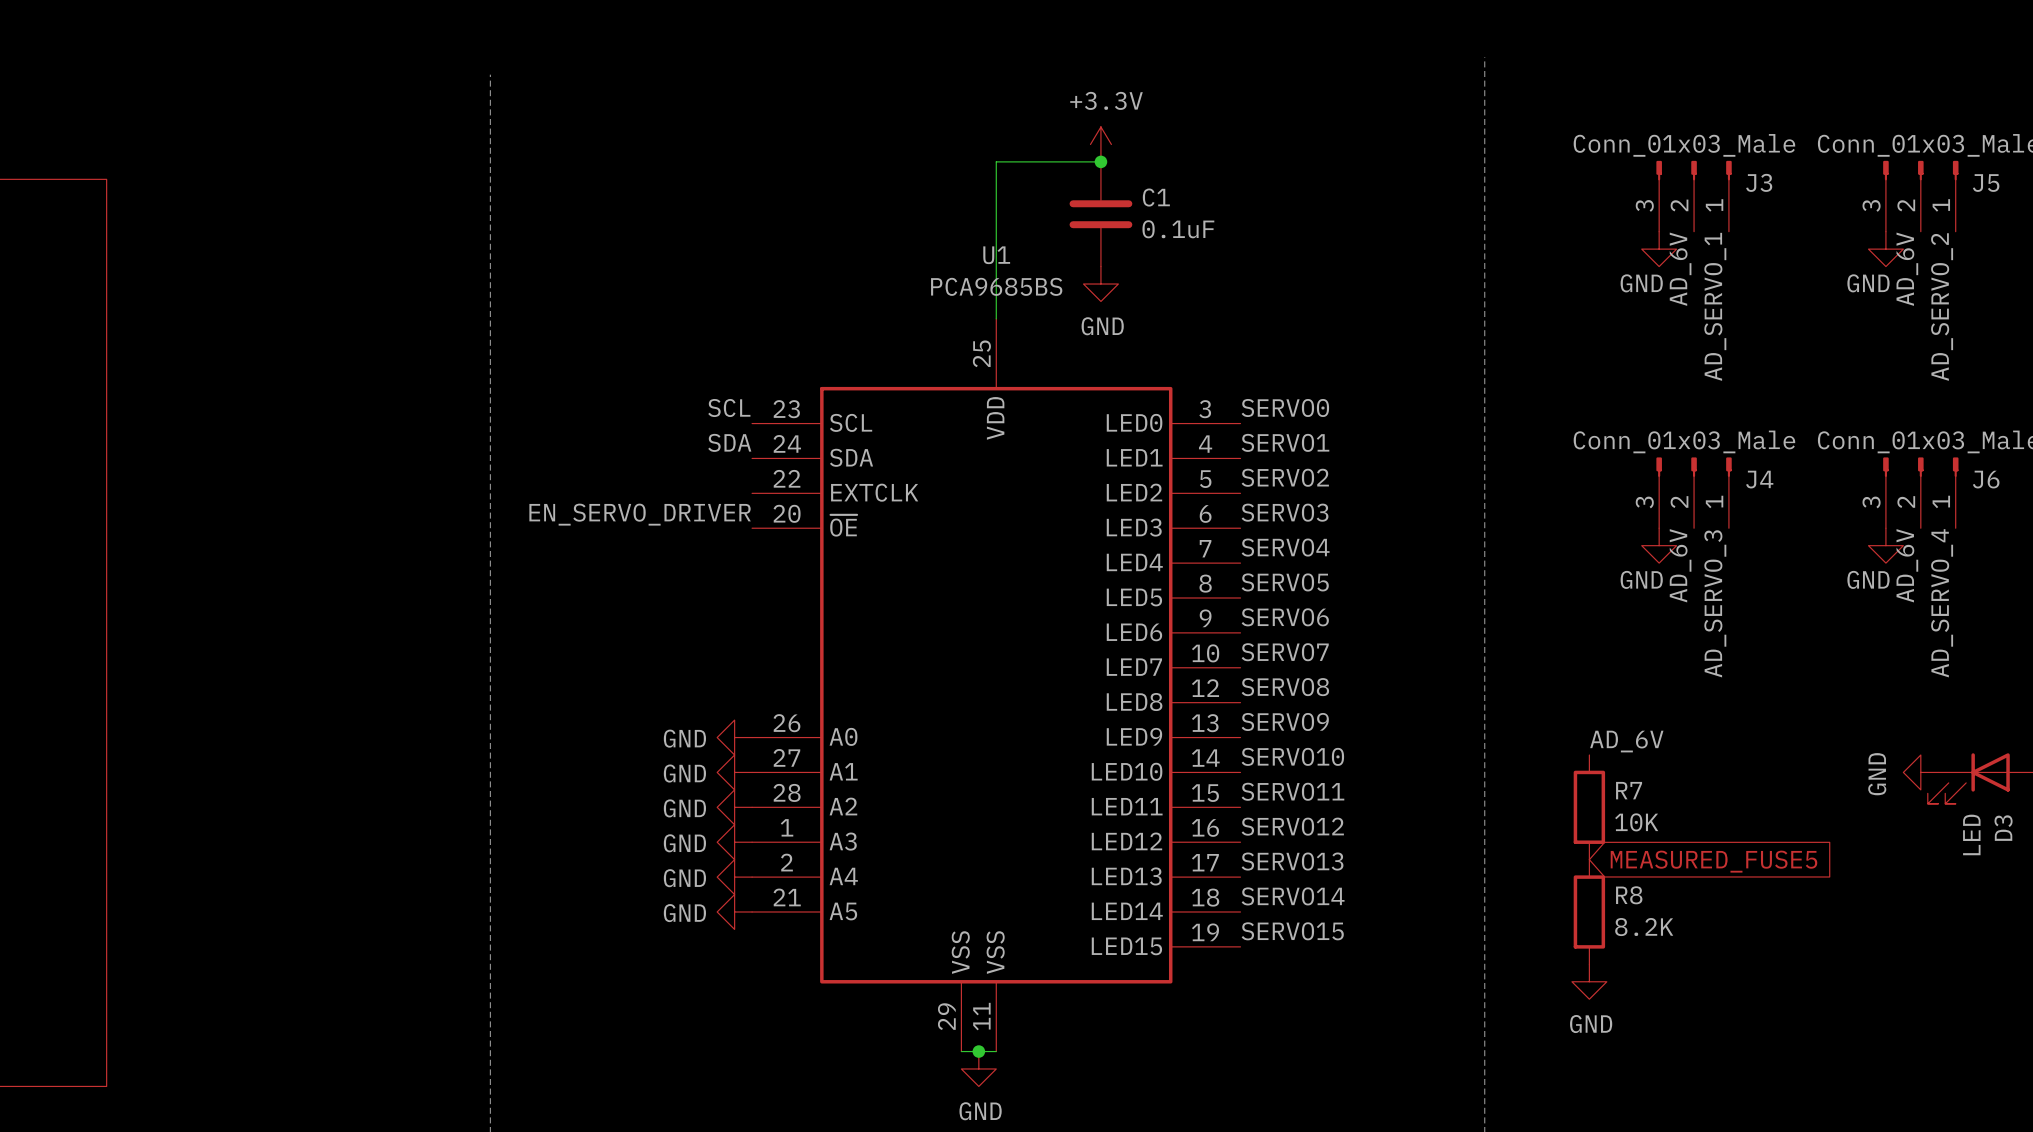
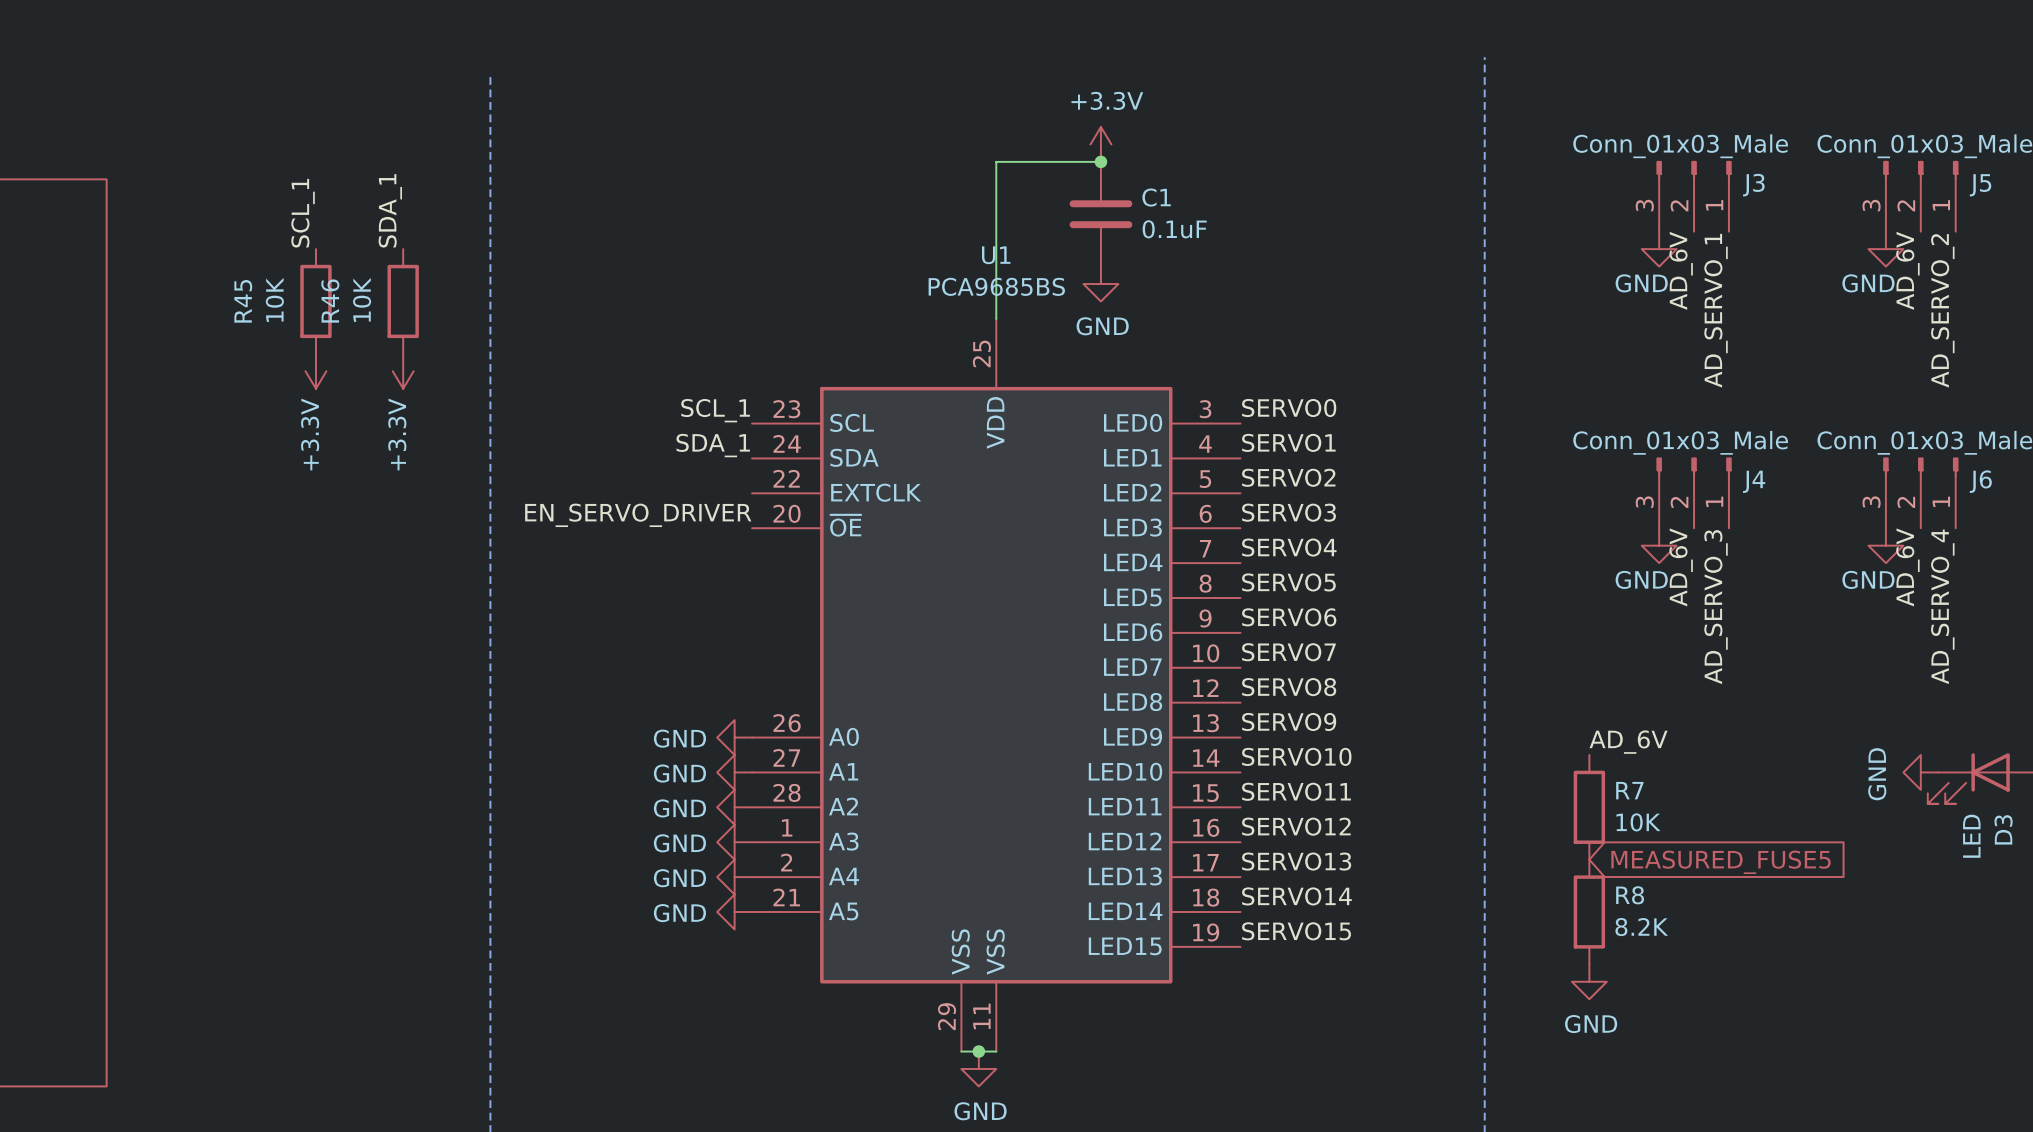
label: none -> SCL_1 (303, 213)
label: none -> SDA_1 (390, 210)
R45: none -> 10K (315, 301)
R46: none -> 10K (403, 301)
power symbol: none -> +3.3V (315, 371)
power symbol: none -> +3.3V (403, 371)
label: SCL (729, 407) -> SCL_1 (715, 410)
label: SDA (729, 442) -> SDA_1 (713, 445)

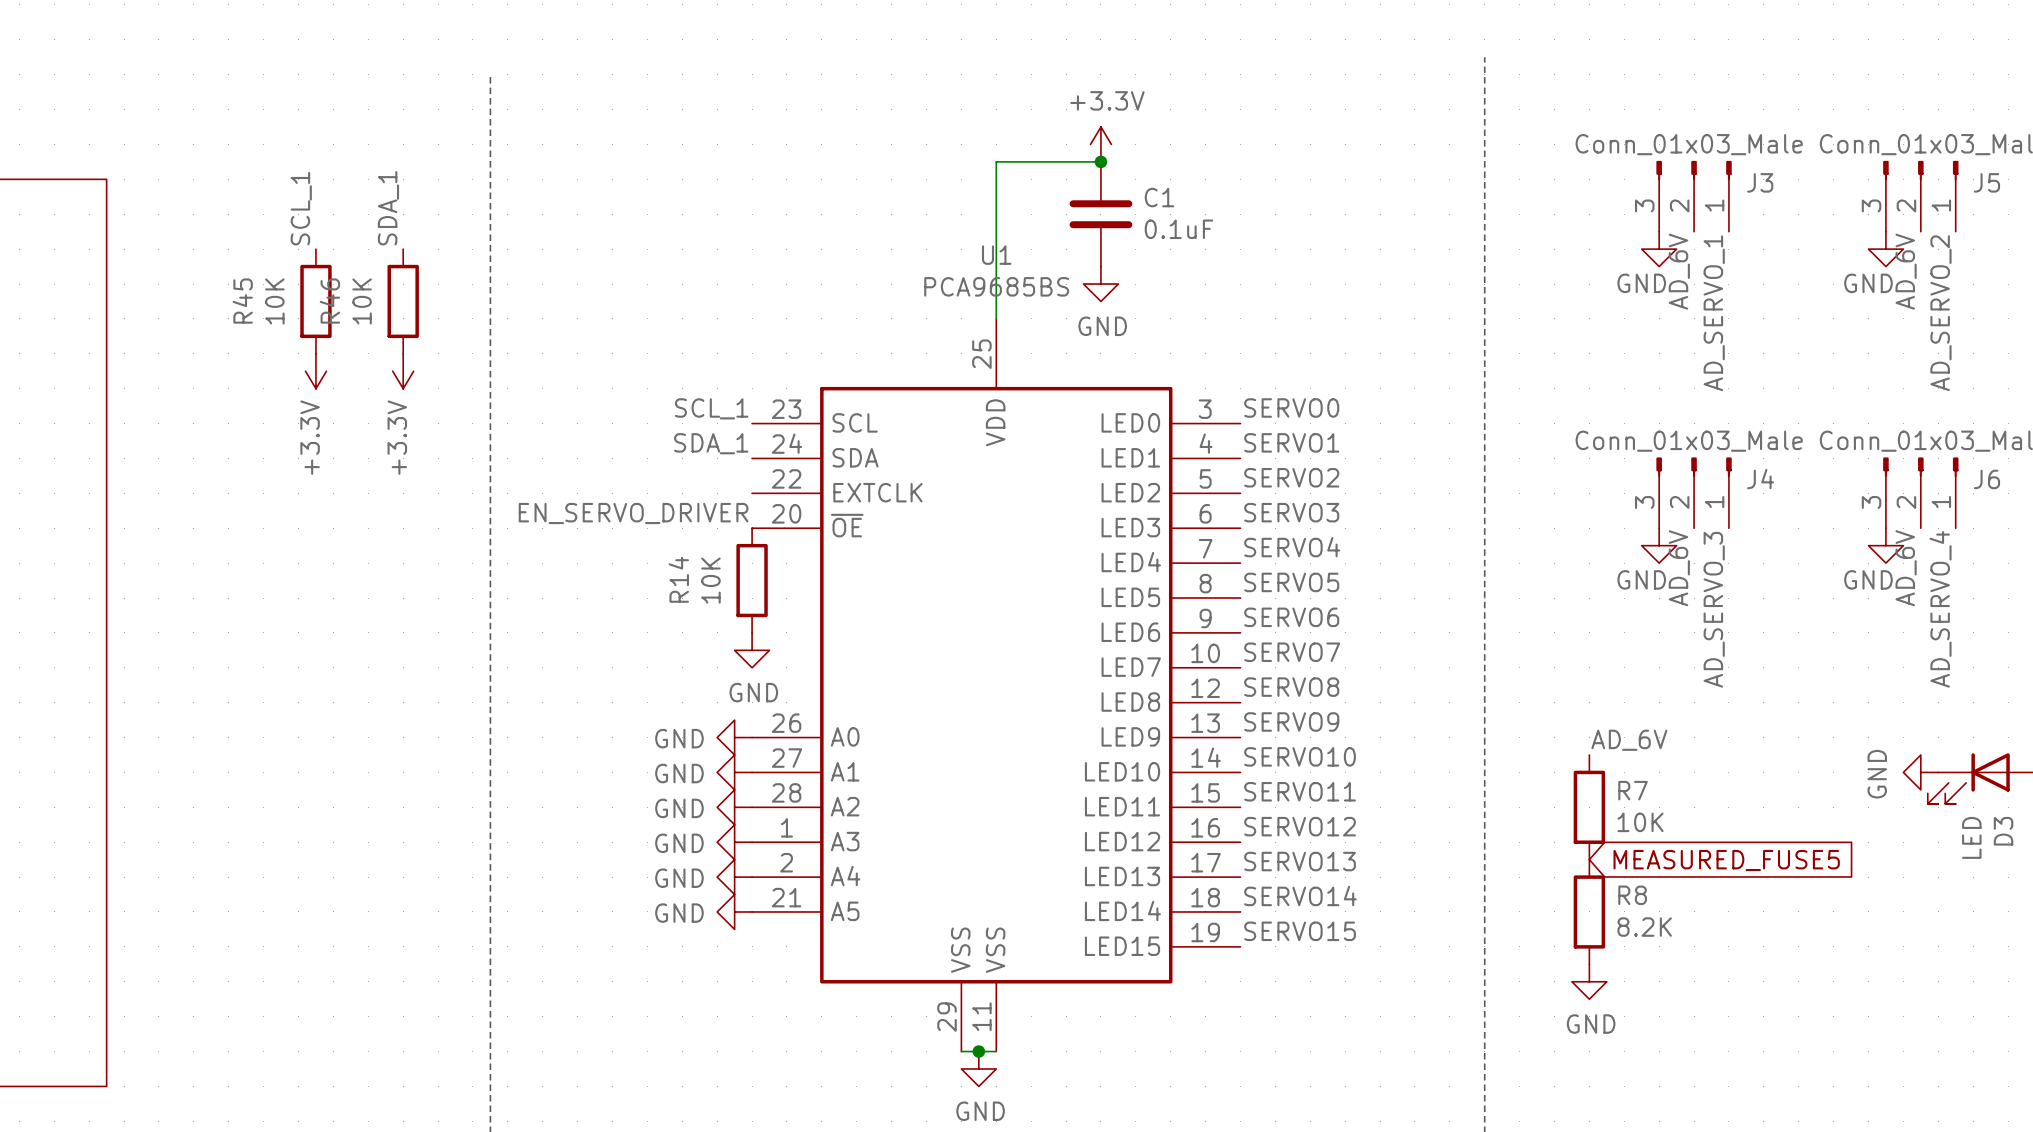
R14: none -> 10K (752, 580)
power symbol: none -> GND (752, 650)

